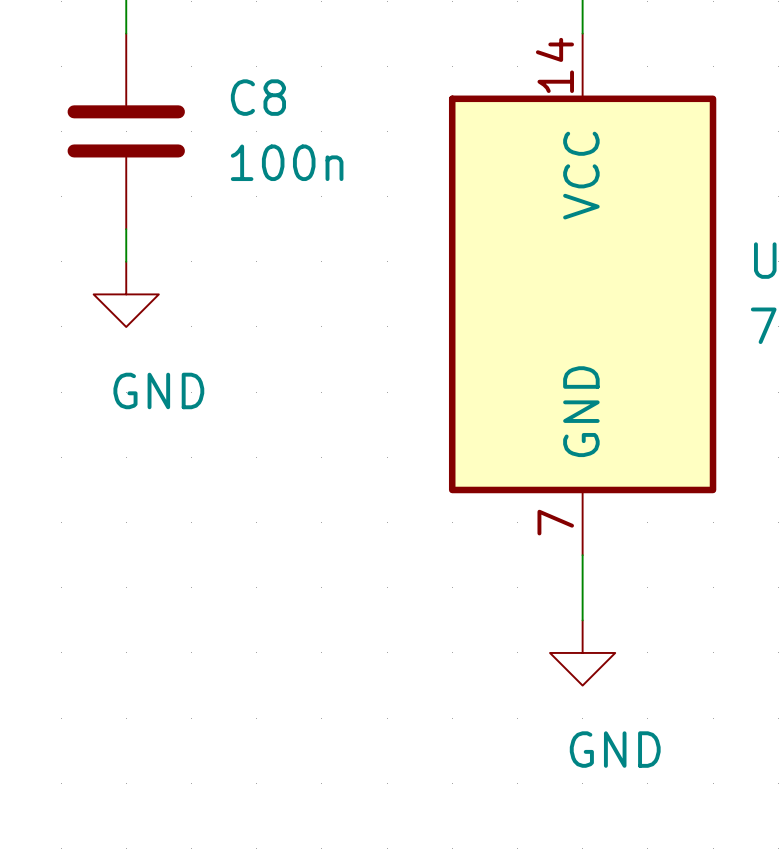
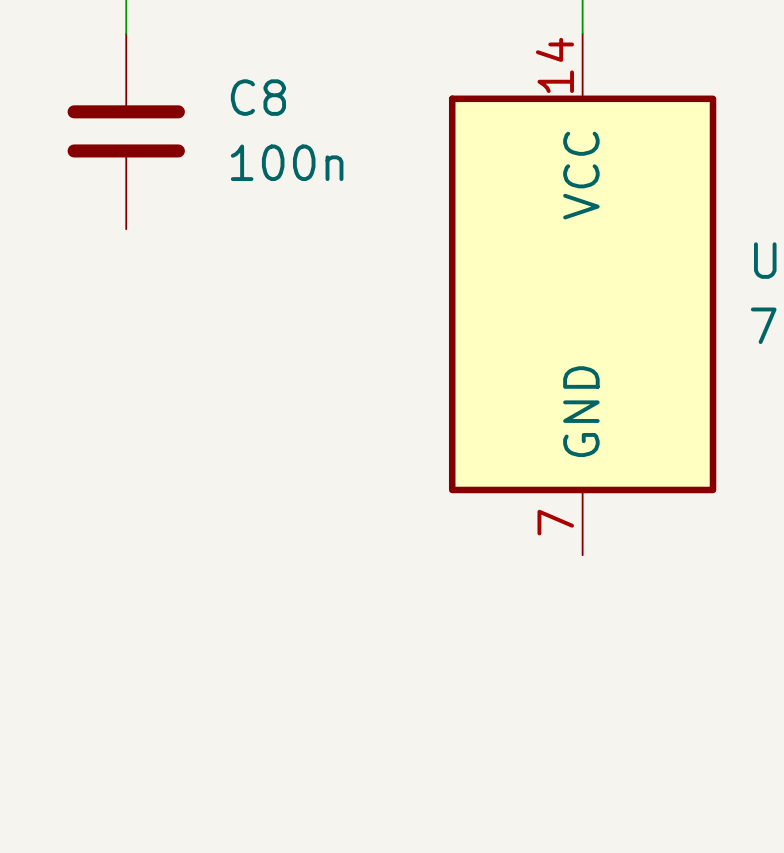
wire: (126, 229) (126, 261) -> none
power symbol: GND (126, 294) -> none
wire: (582, 555) (582, 620) -> none
power symbol: GND (582, 652) -> none

